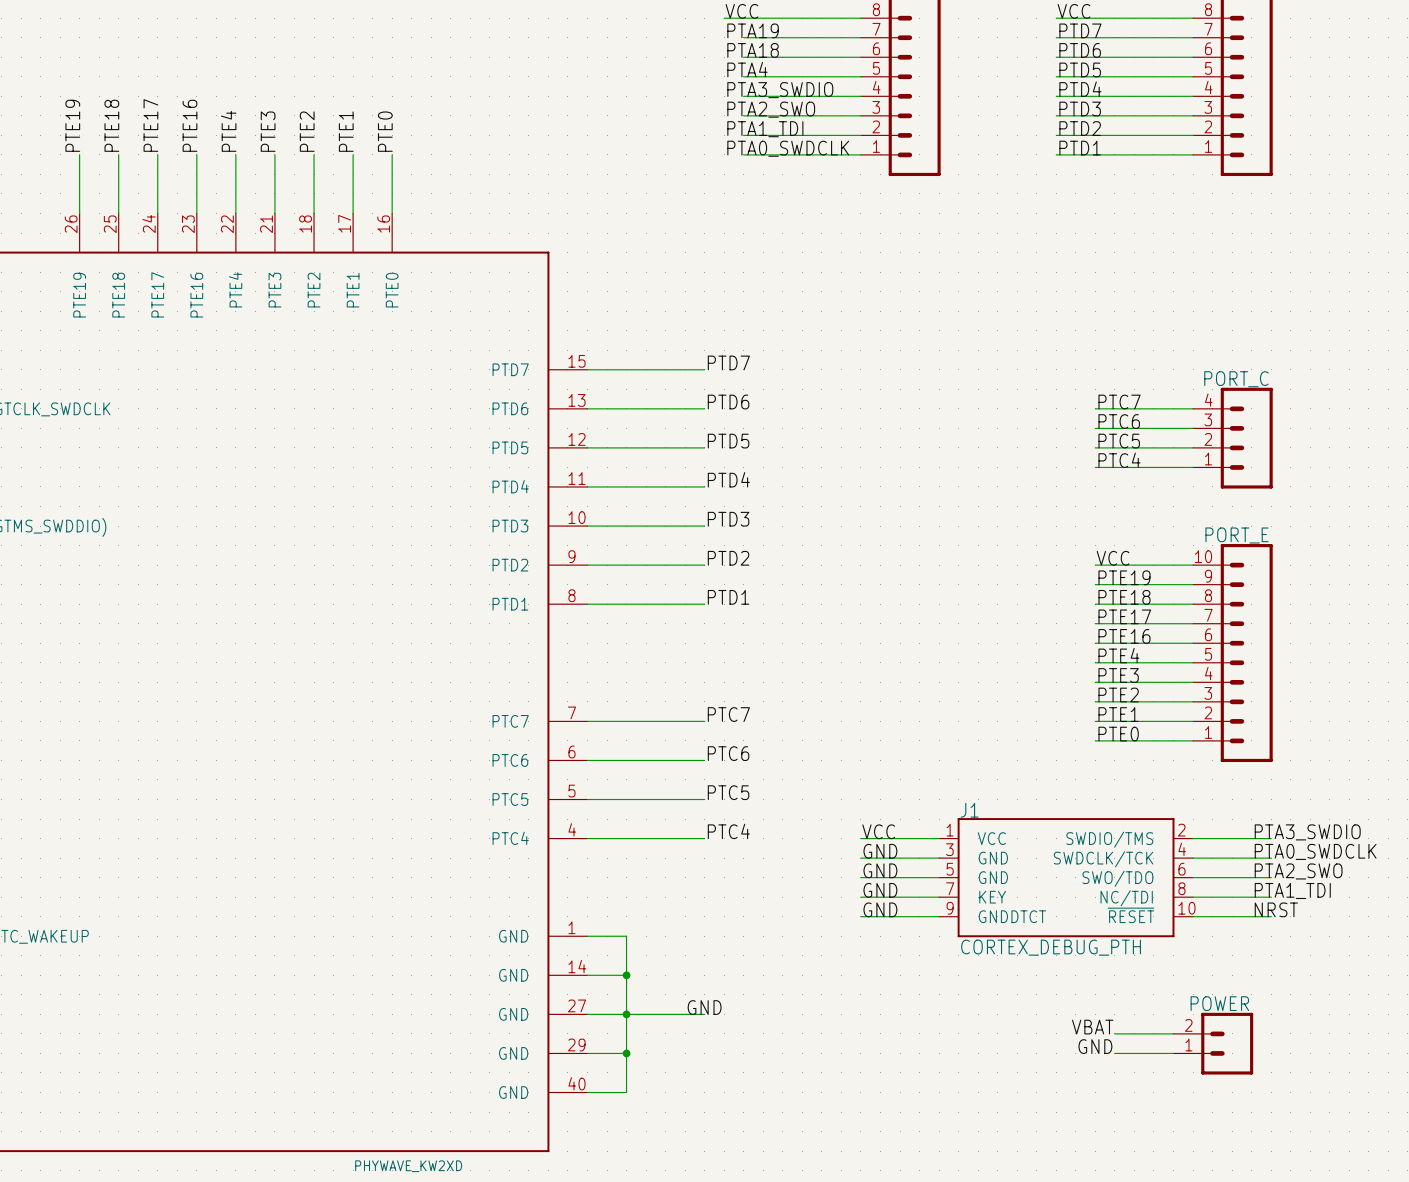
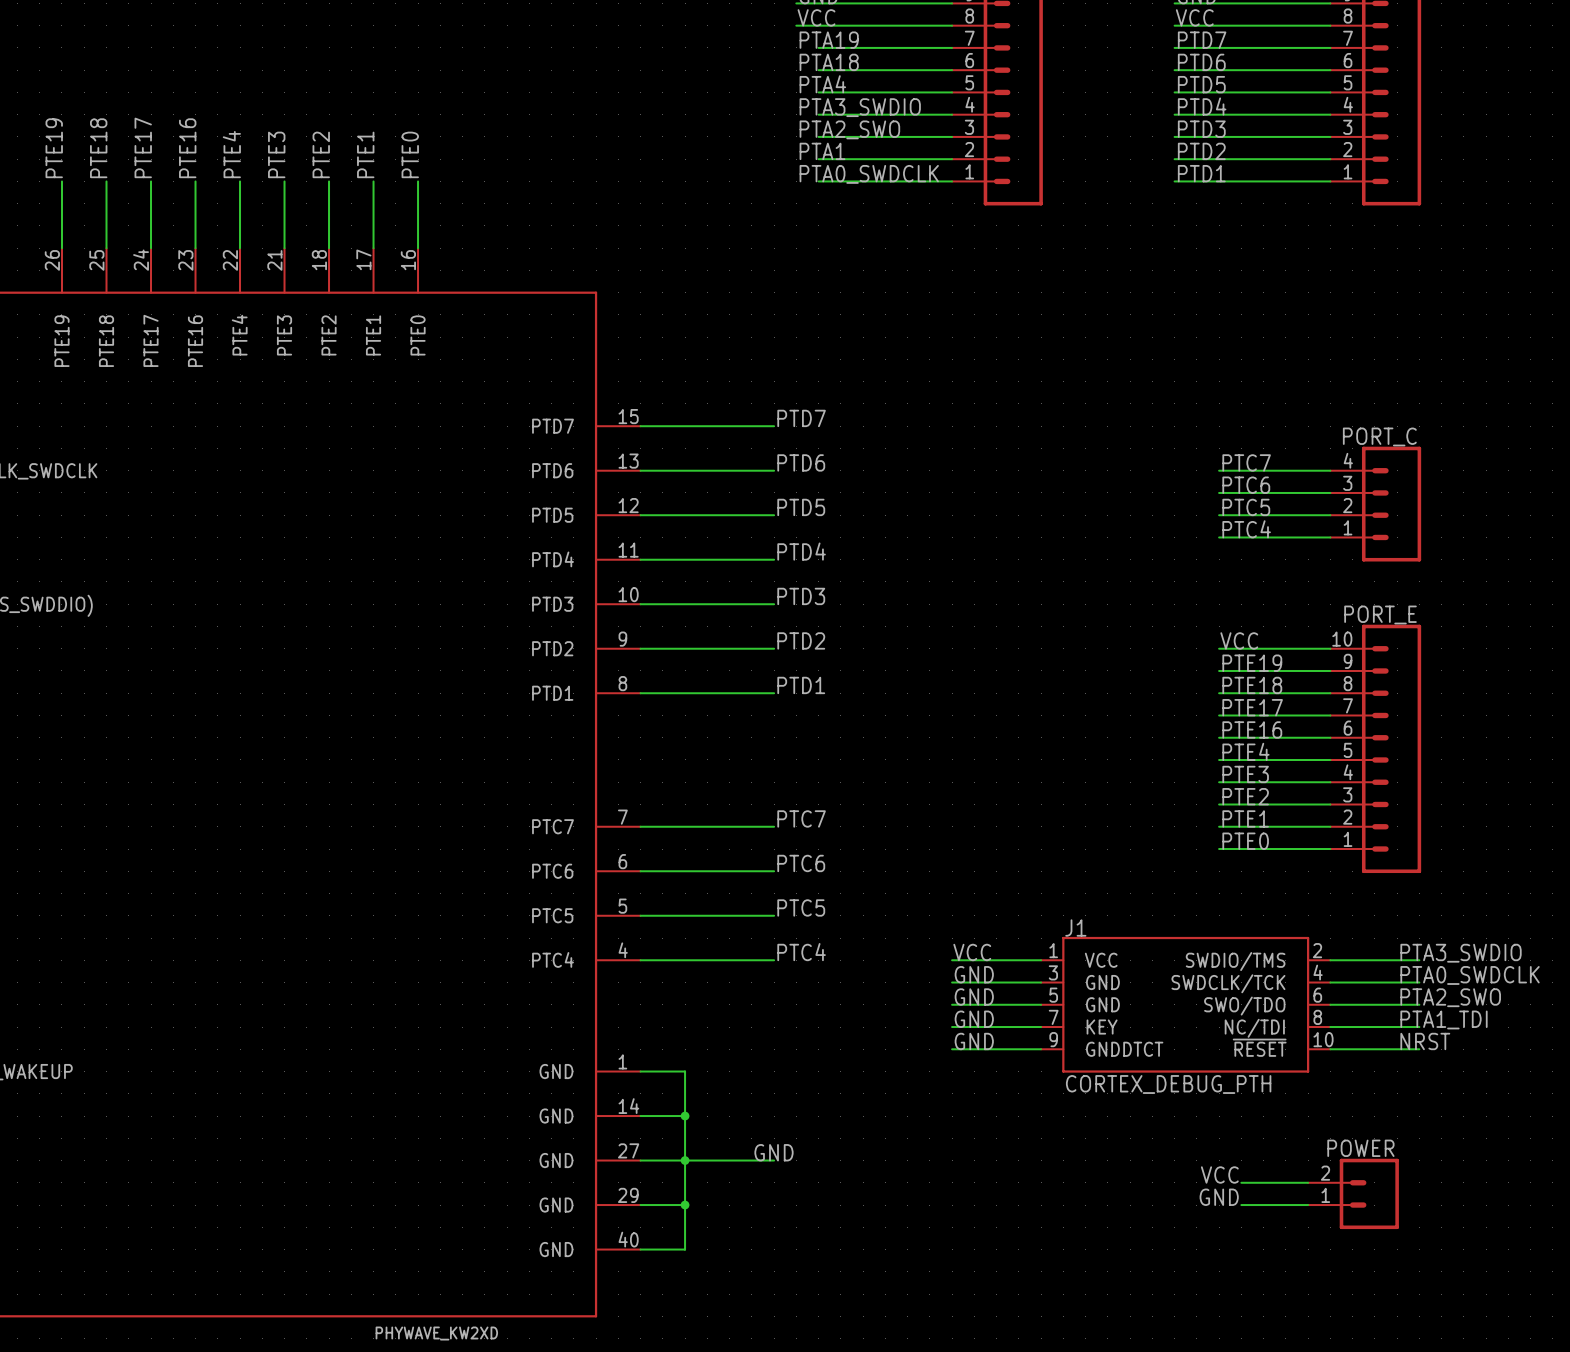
label: PTA1_TDI (765, 129) -> PTA1 (822, 151)
label: VBAT (1092, 1027) -> VCC (1219, 1174)

